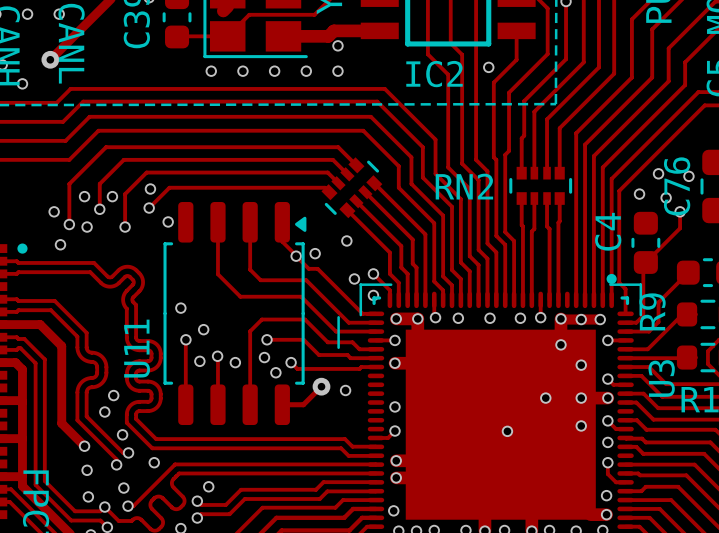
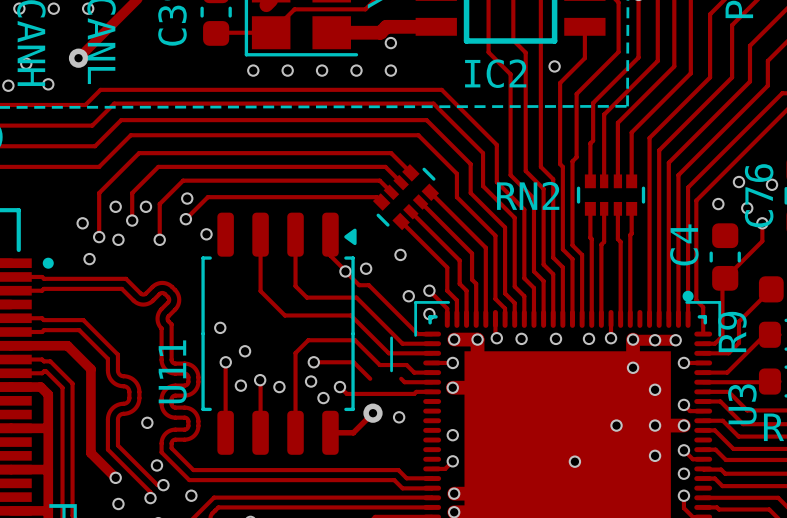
track: (318, 355) (347, 355) -> none
via: (104, 412) -> none

